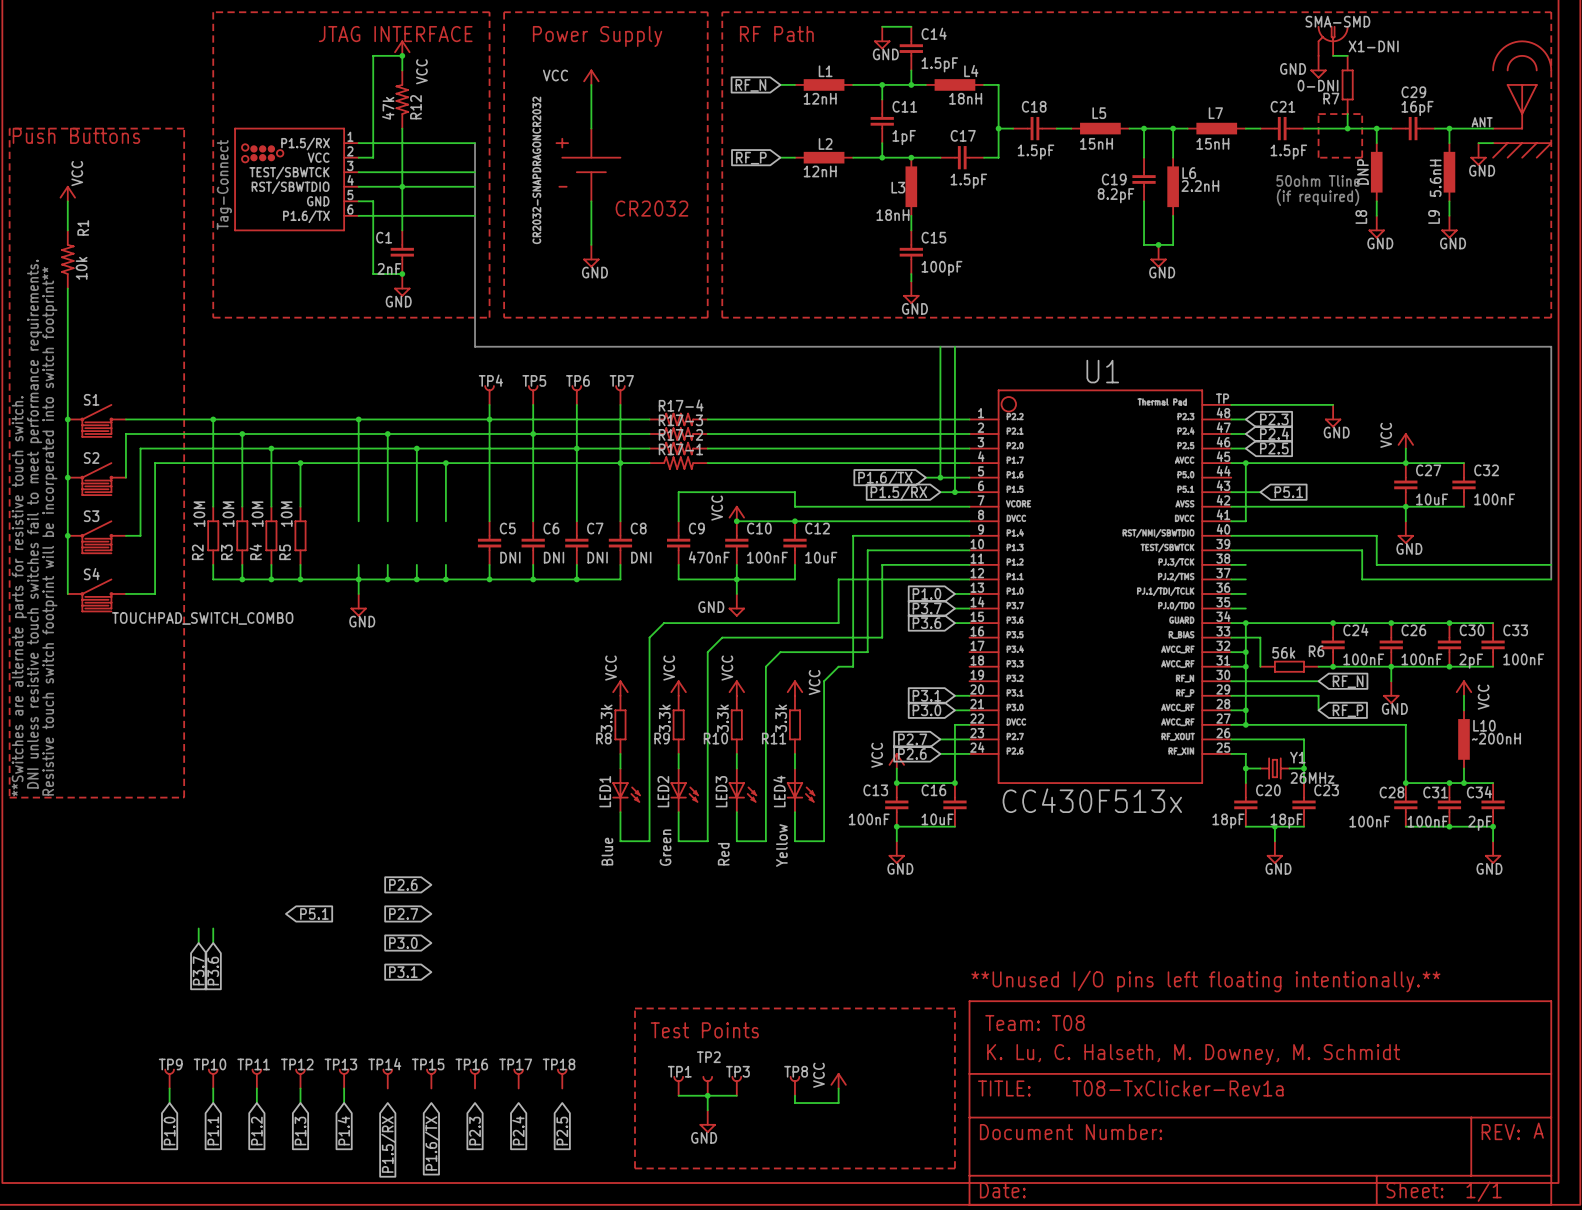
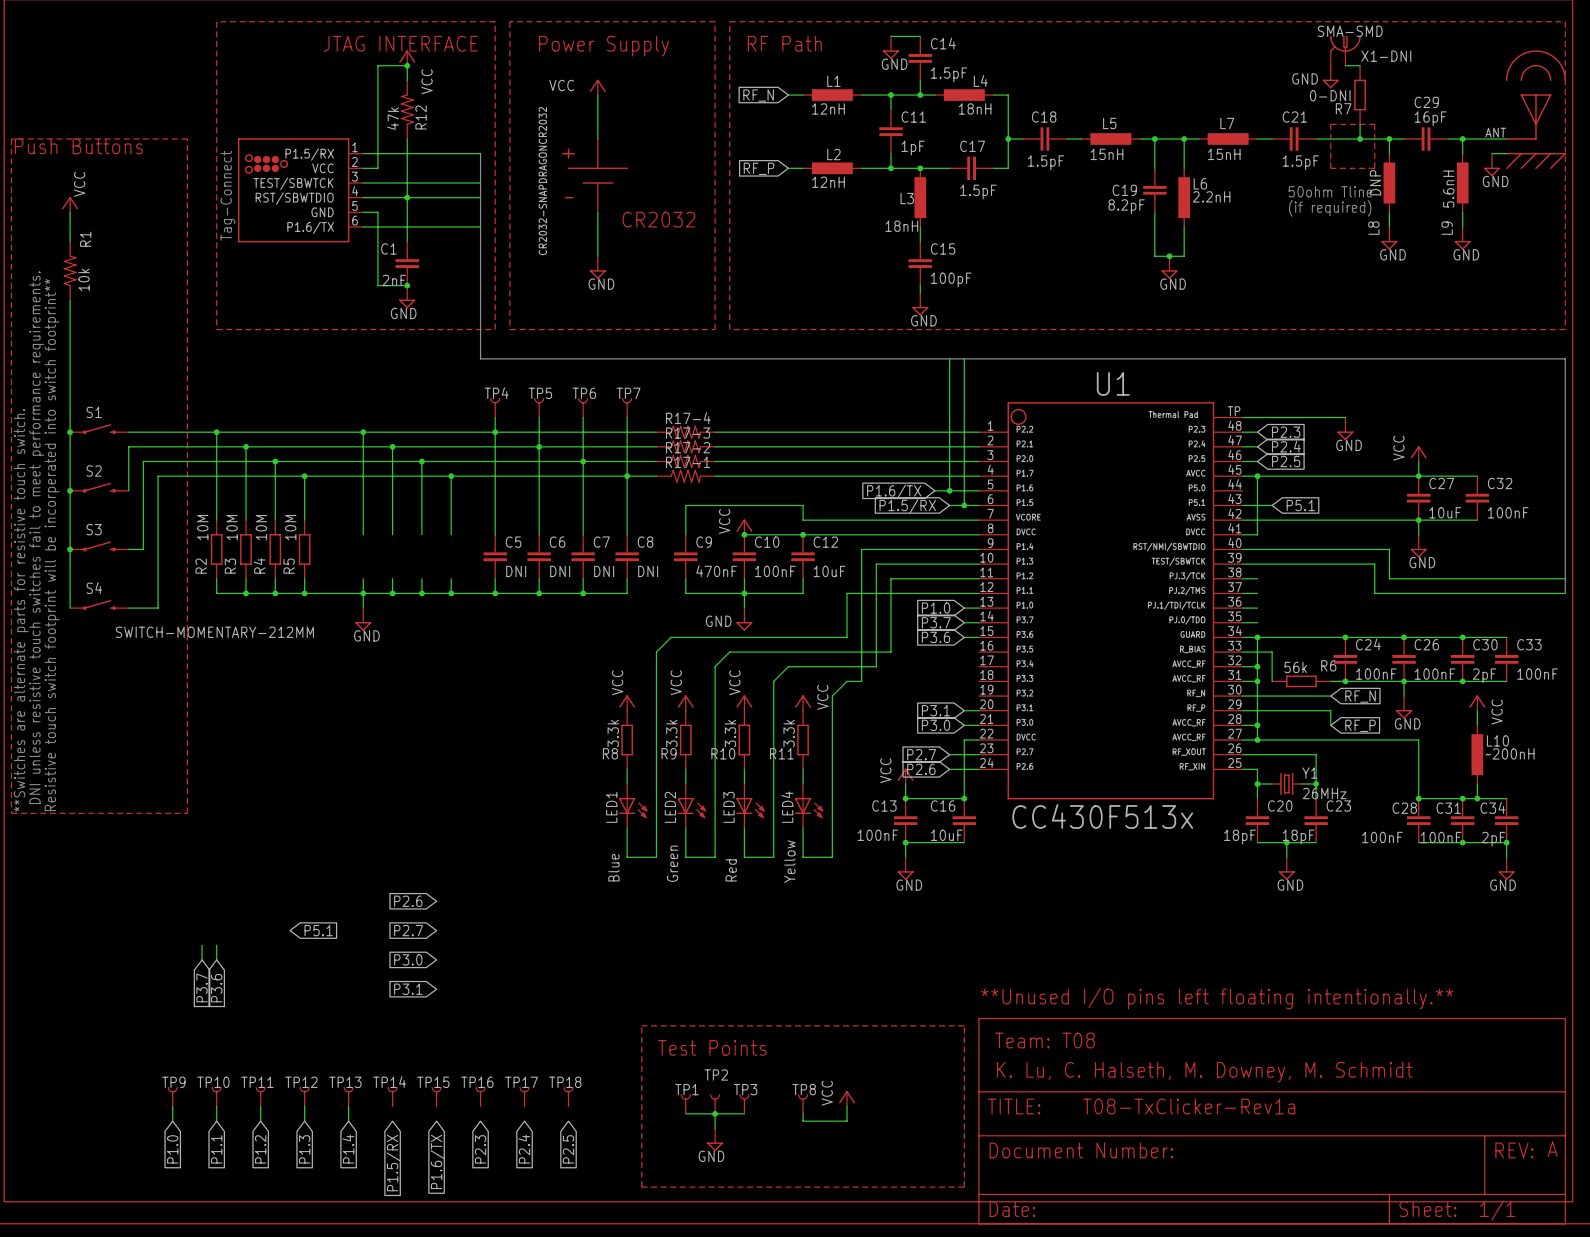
S1 symbol: [67, 404, 126, 438] -> [70, 424, 129, 435]
S2 symbol: [67, 462, 126, 496] -> [70, 482, 129, 493]
S3 symbol: [67, 520, 126, 554] -> [70, 541, 129, 552]
S4 symbol: [67, 578, 126, 613] -> [70, 600, 129, 610]
S4 value: TOUCHPAD_SWITCH_COMBO (202, 618) -> SWITCH-MOMENTARY-212MM (214, 632)

